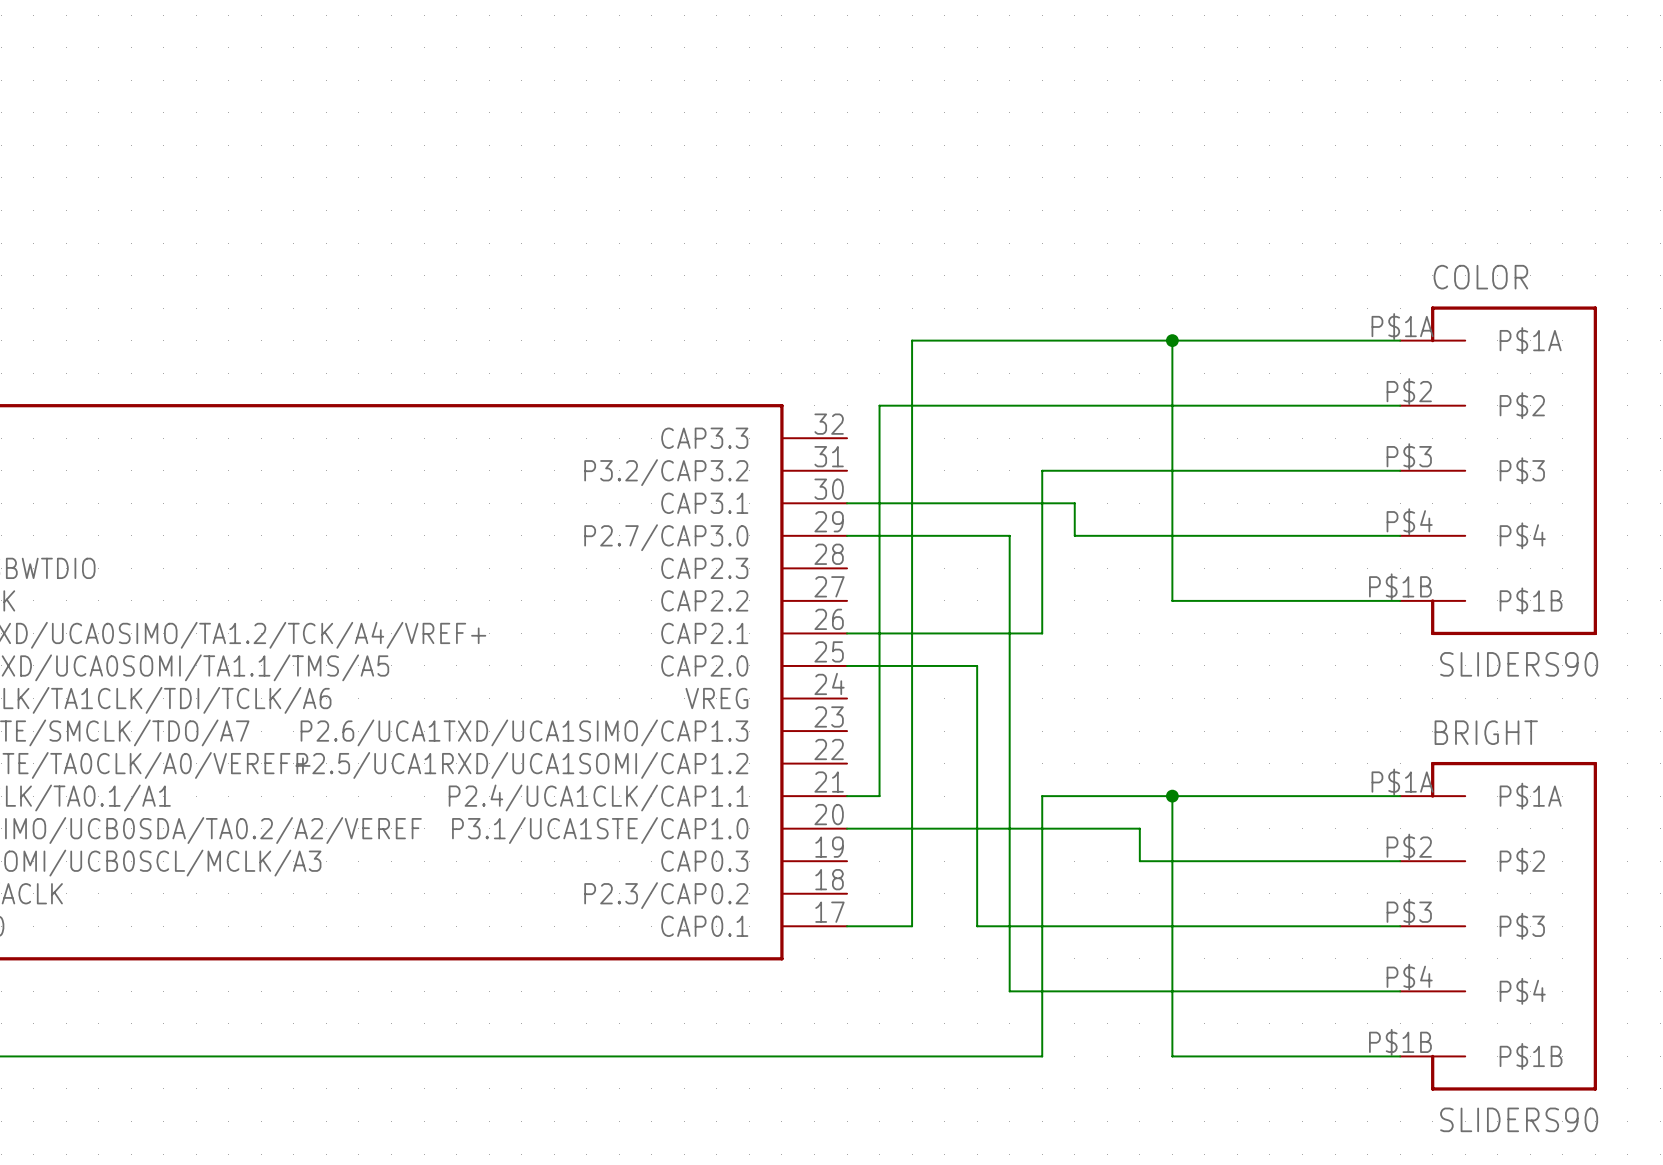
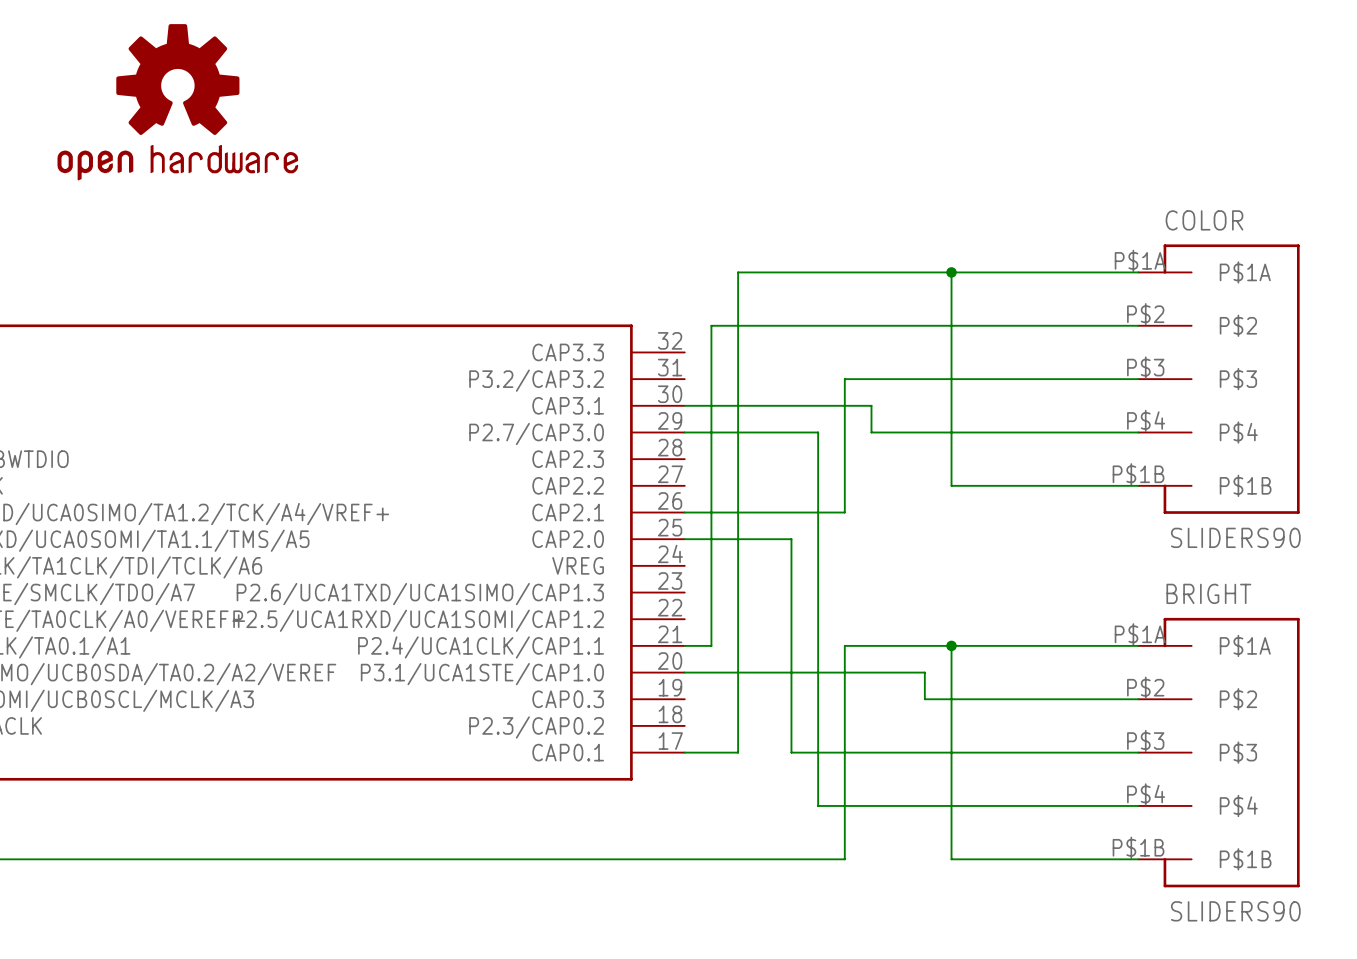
part: none -> (177, 102)

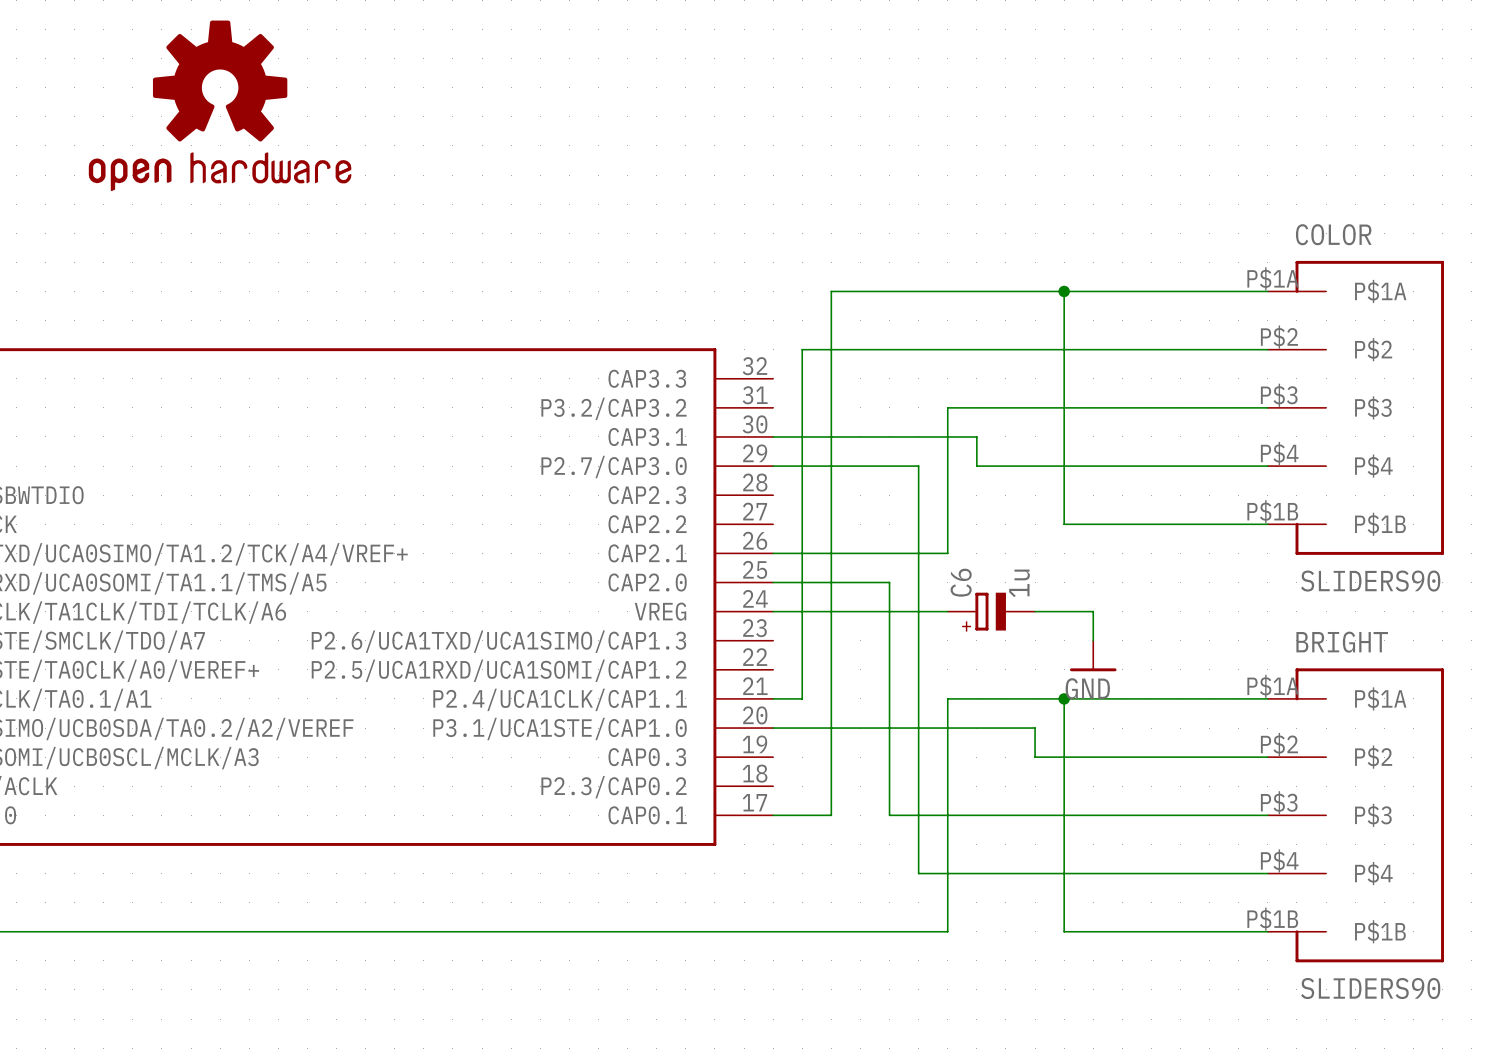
wire: none -> (773, 611) (947, 611)
C6: none -> 1u (991, 611)
wire: none -> (1035, 611) (1093, 611) (1093, 640)
power symbol: none -> GND (1093, 655)

